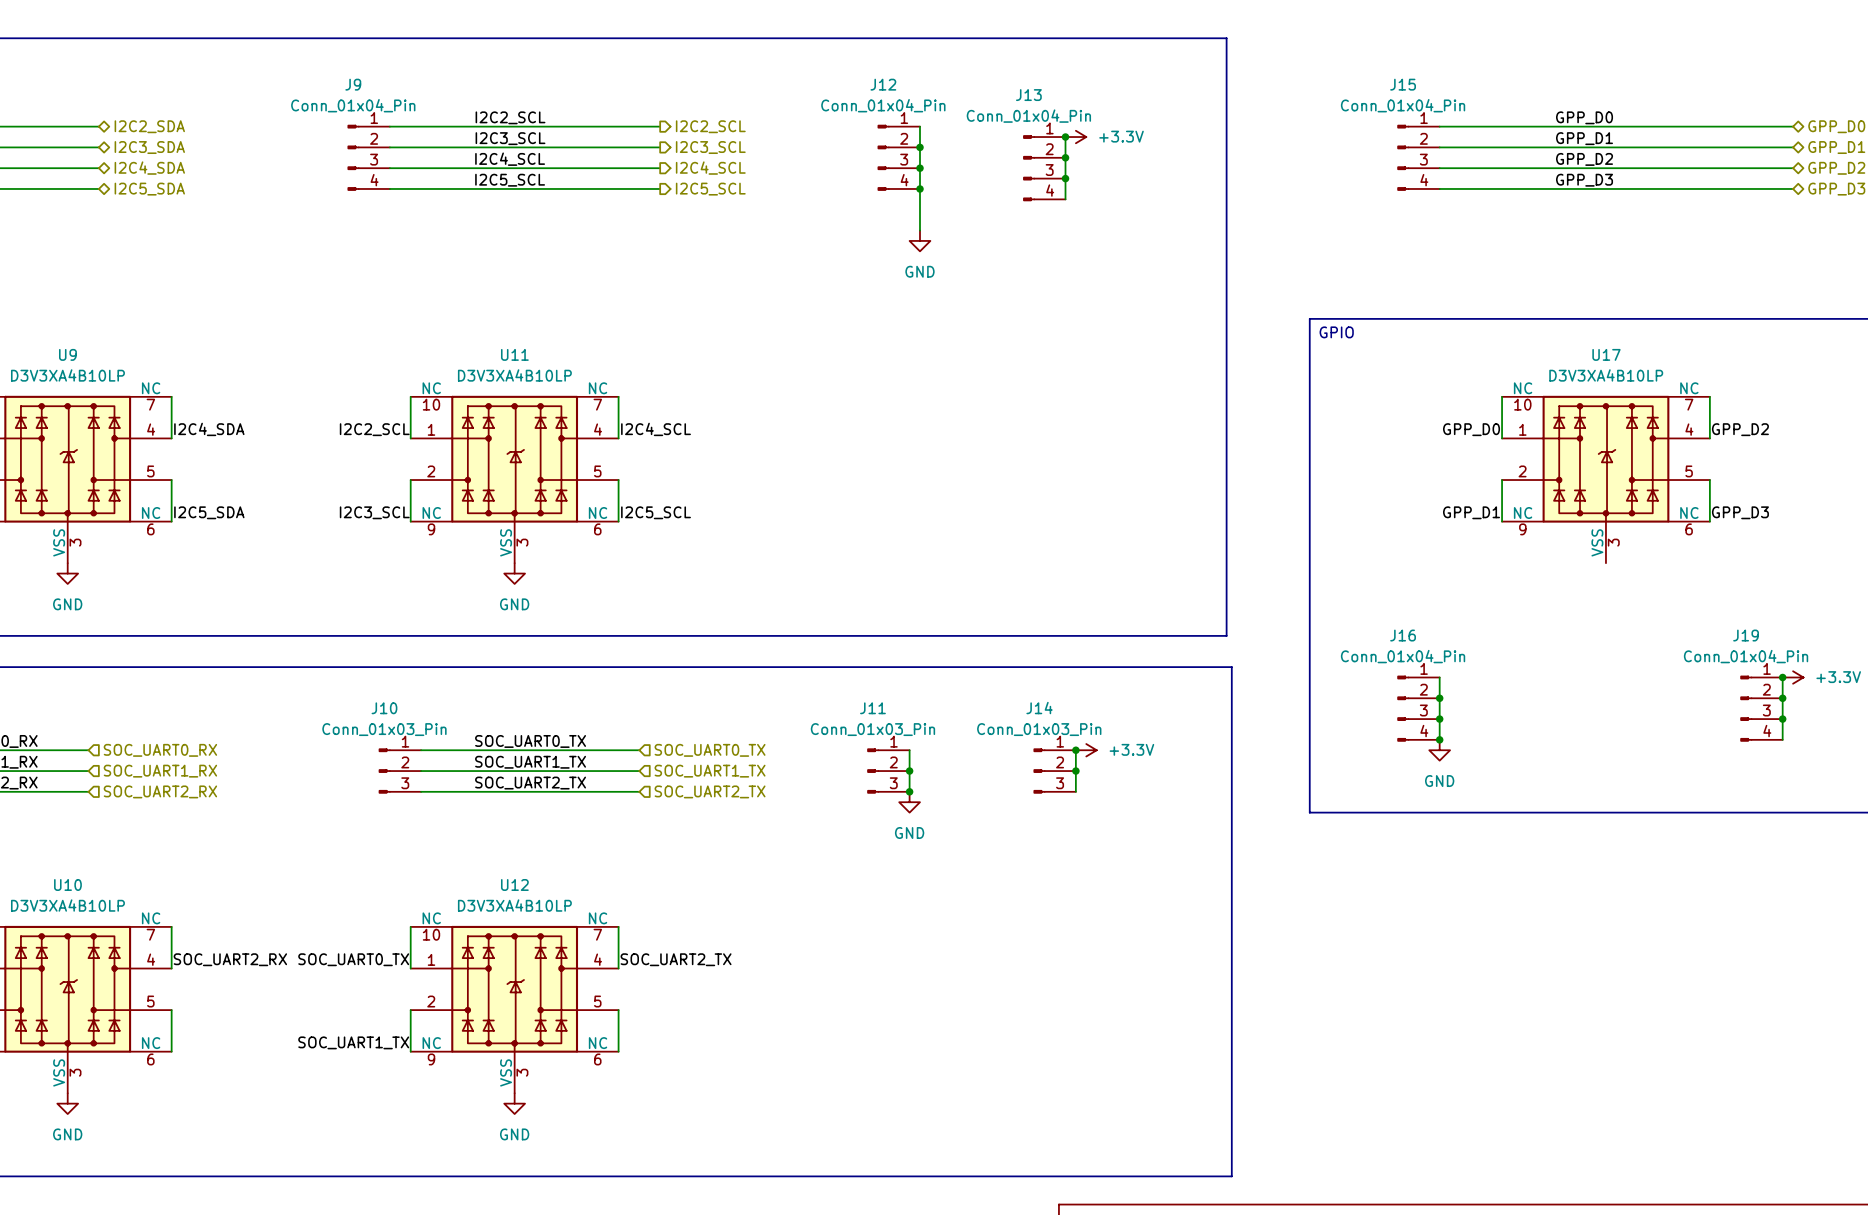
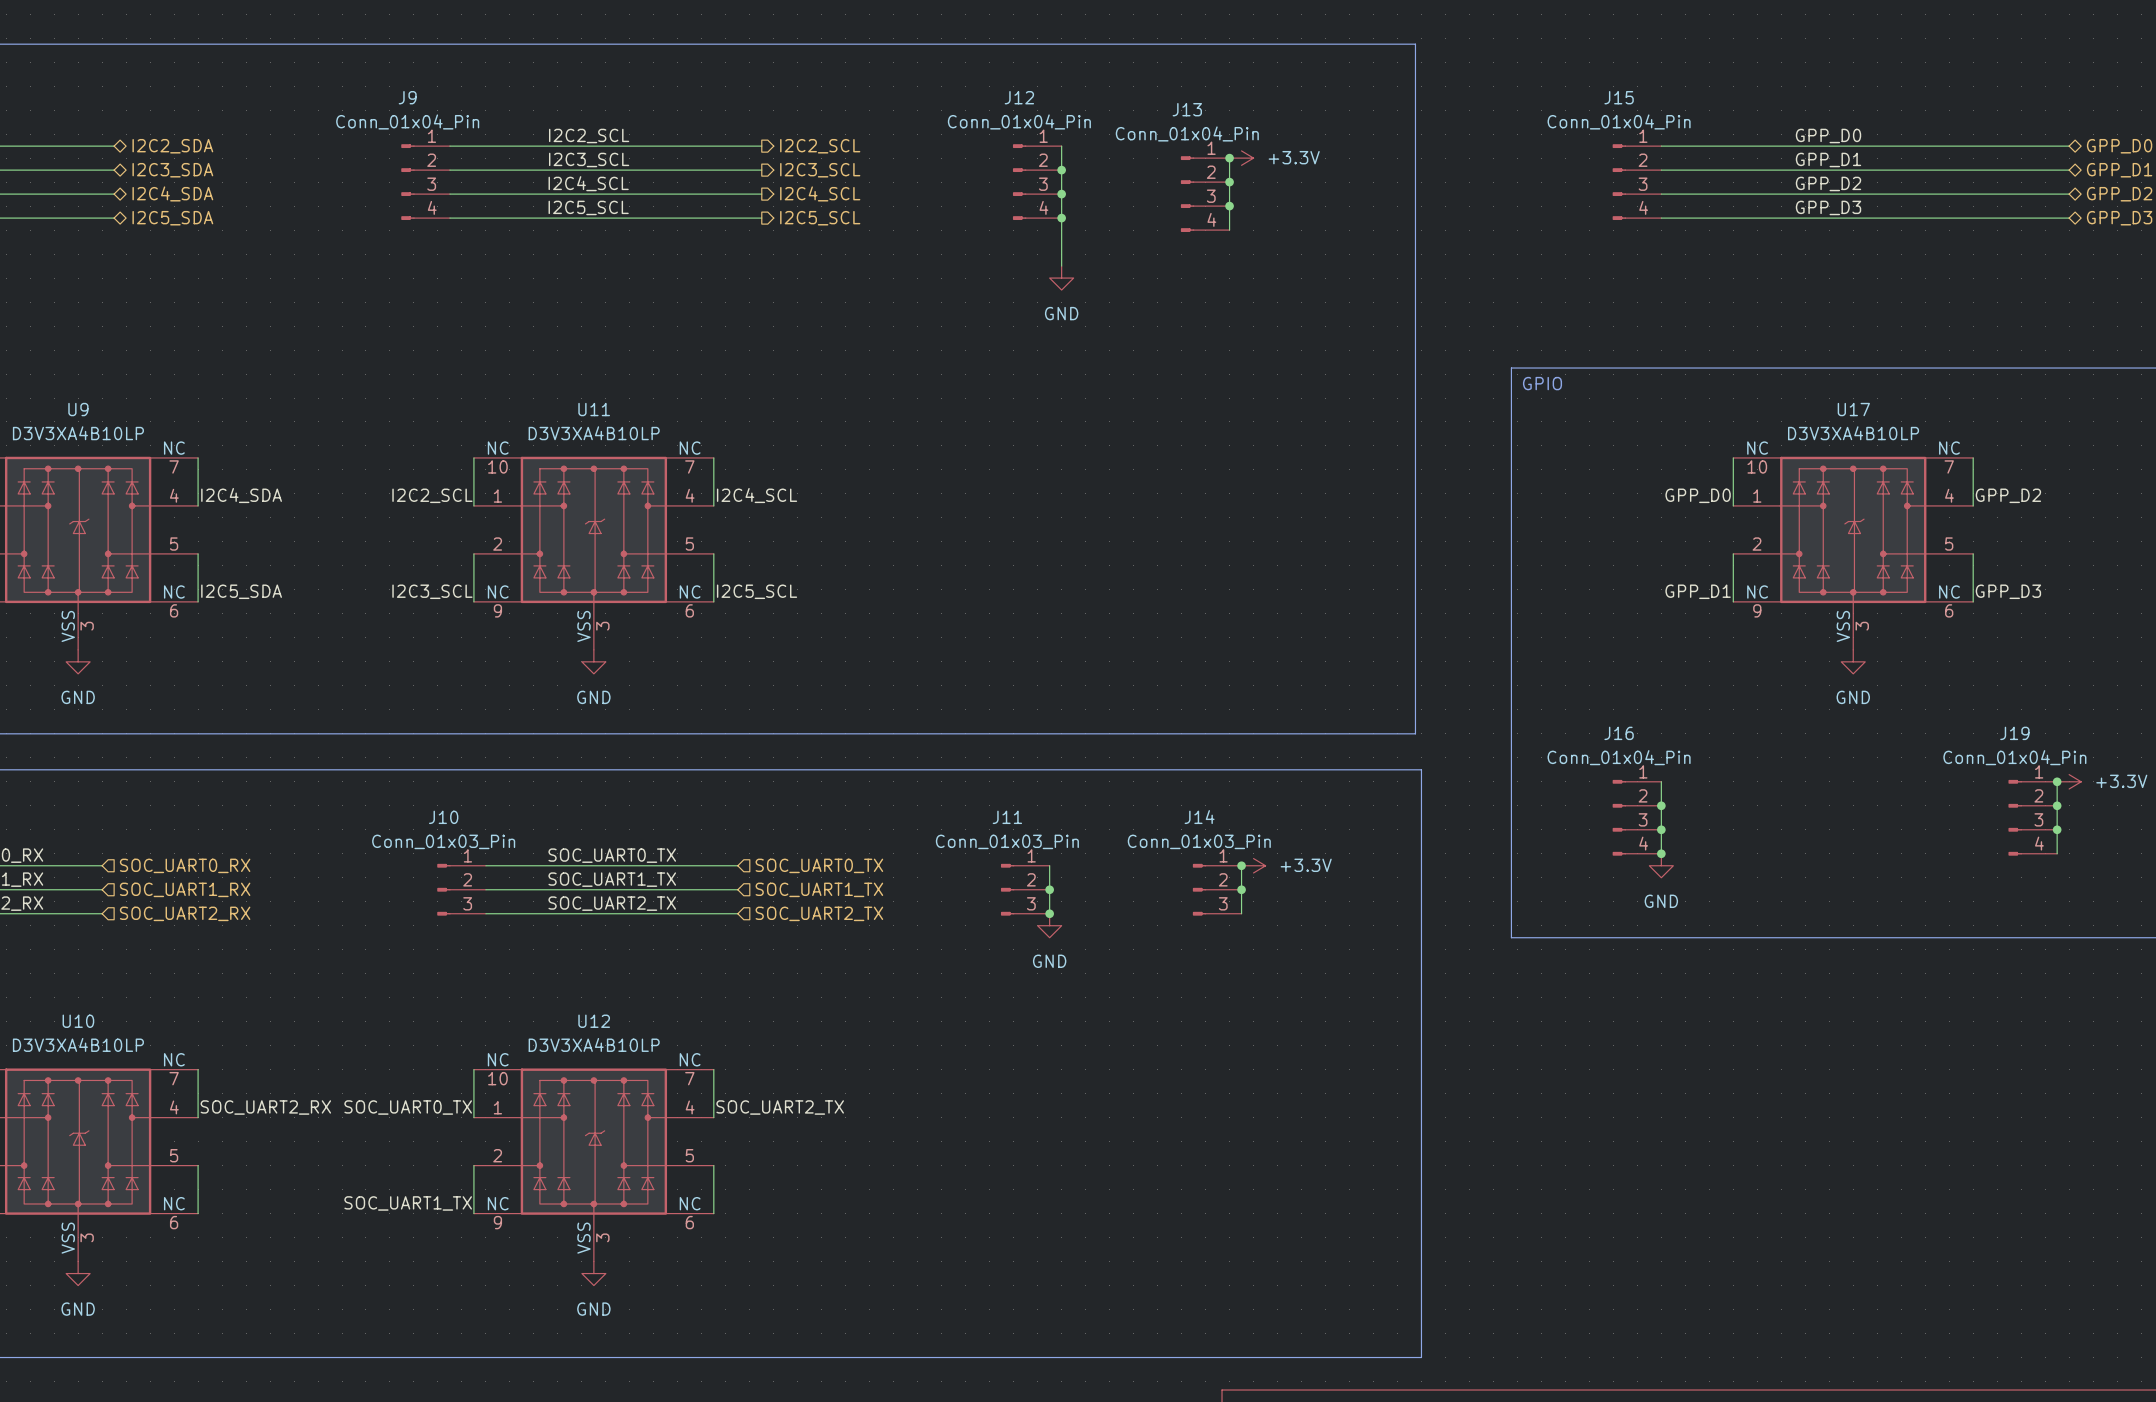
power symbol: none -> GND (1853, 661)

